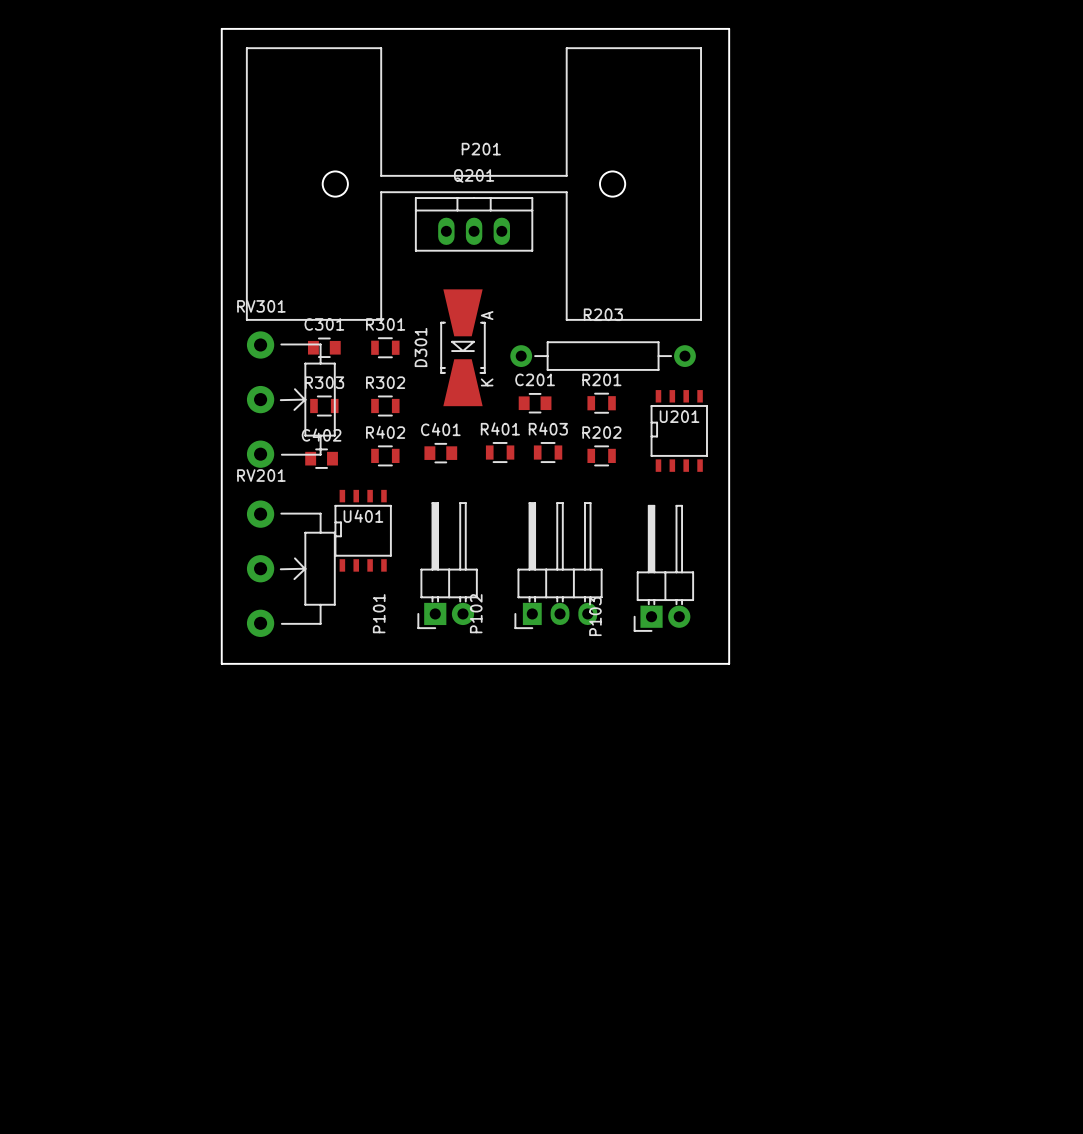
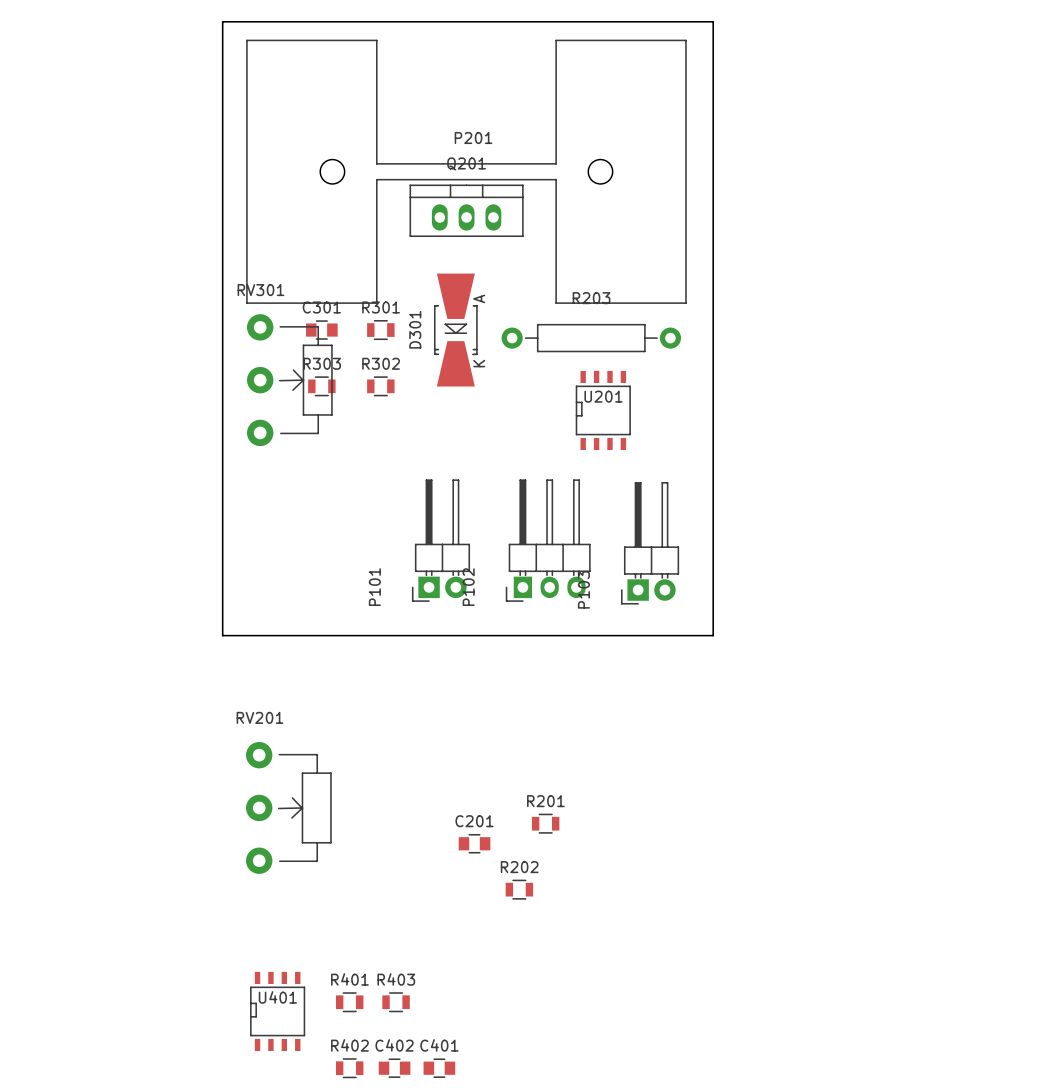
C201 position: (535, 403) -> (474, 843)
R201 position: (601, 403) -> (545, 823)
U201 position: (679, 430) -> (603, 410)
R401 position: (500, 452) -> (349, 1002)
R403 position: (548, 452) -> (396, 1002)
C401 position: (440, 453) -> (439, 1068)
R402 position: (385, 455) -> (349, 1068)
R202 position: (601, 455) -> (519, 889)
C402 position: (321, 458) -> (394, 1068)
U401 position: (363, 530) -> (277, 1011)
RV201 position: (291, 568) -> (288, 807)

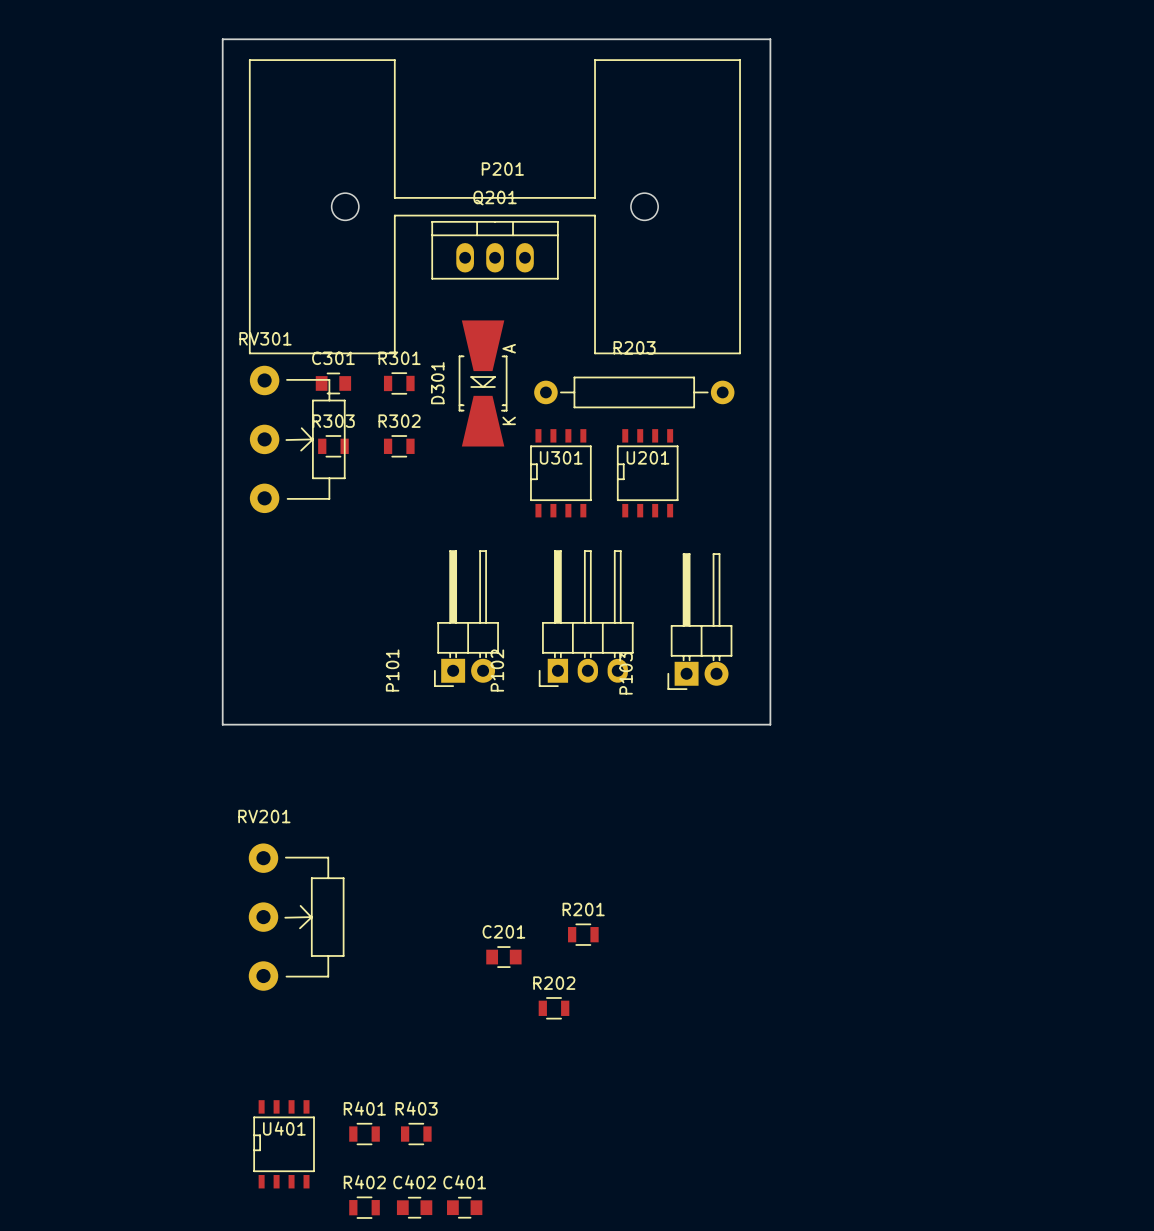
U301: none -> (560, 473)

